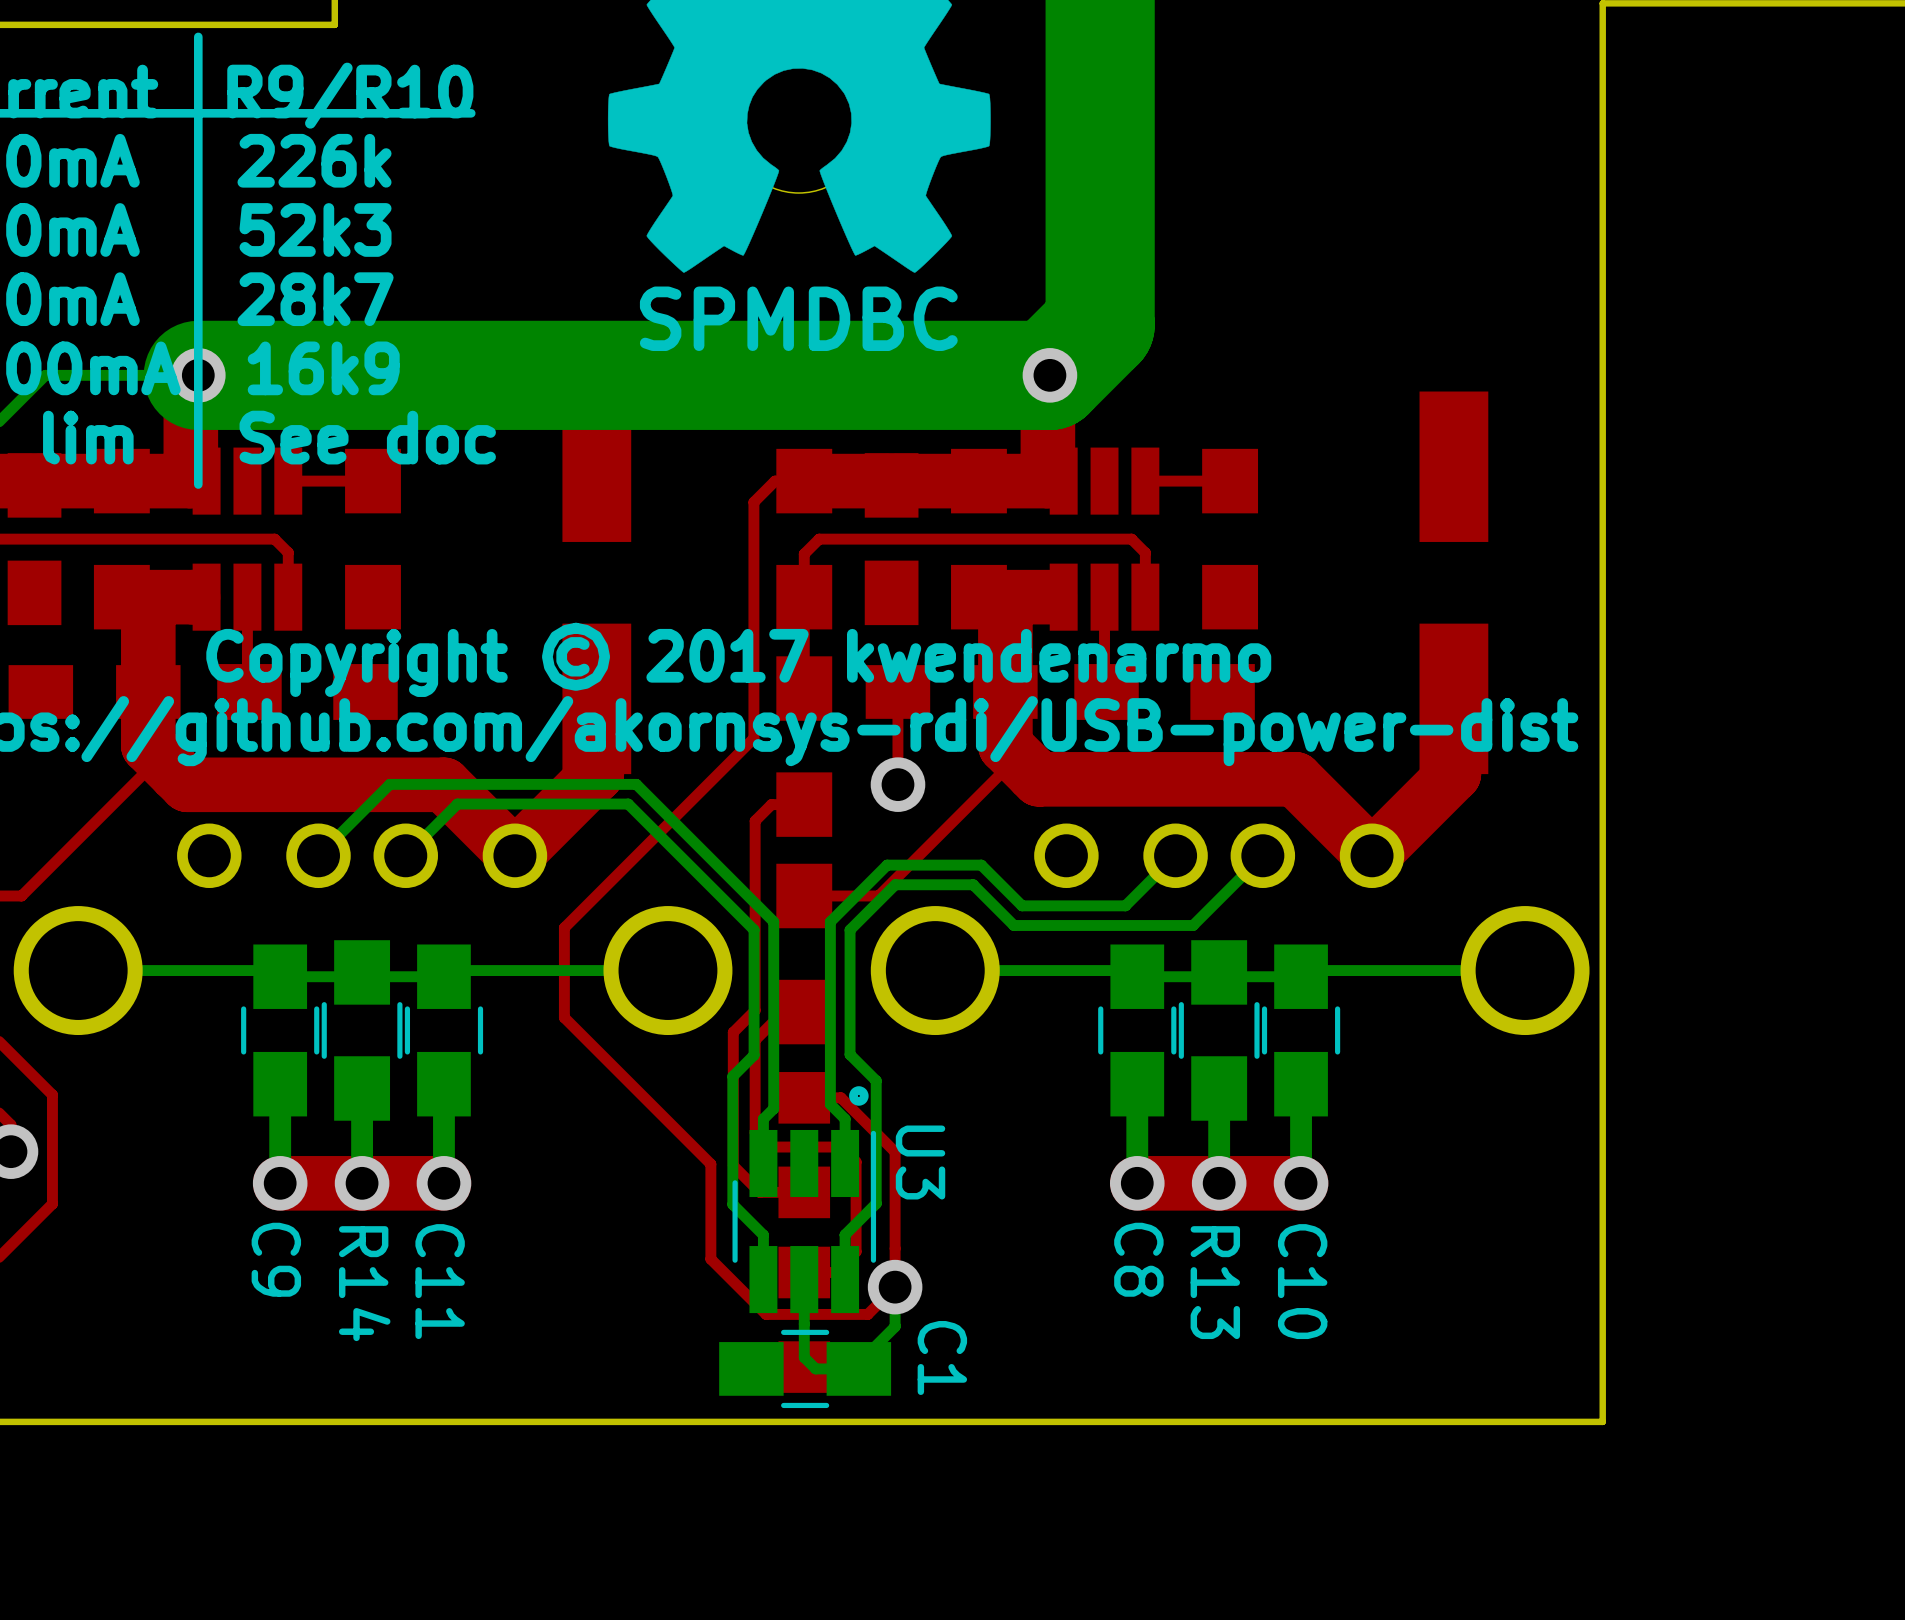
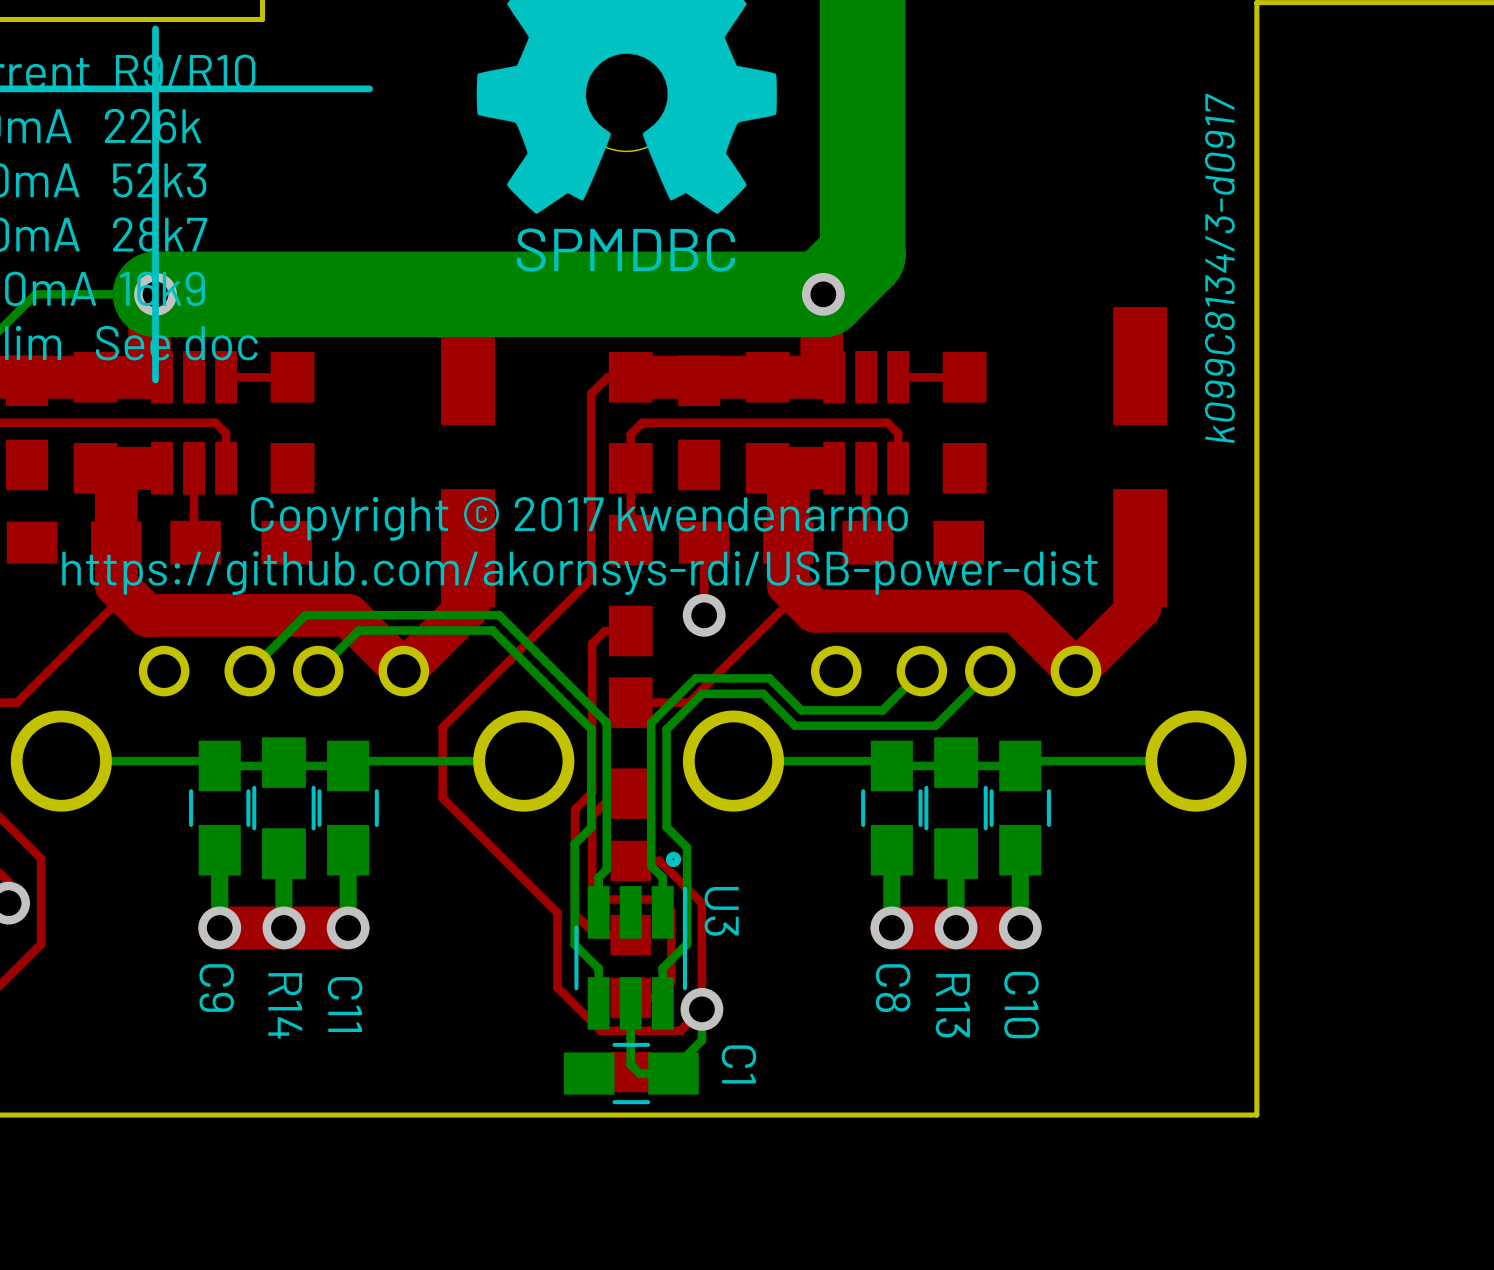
text: none -> k099C8134/3-d0917 (1219, 268)

